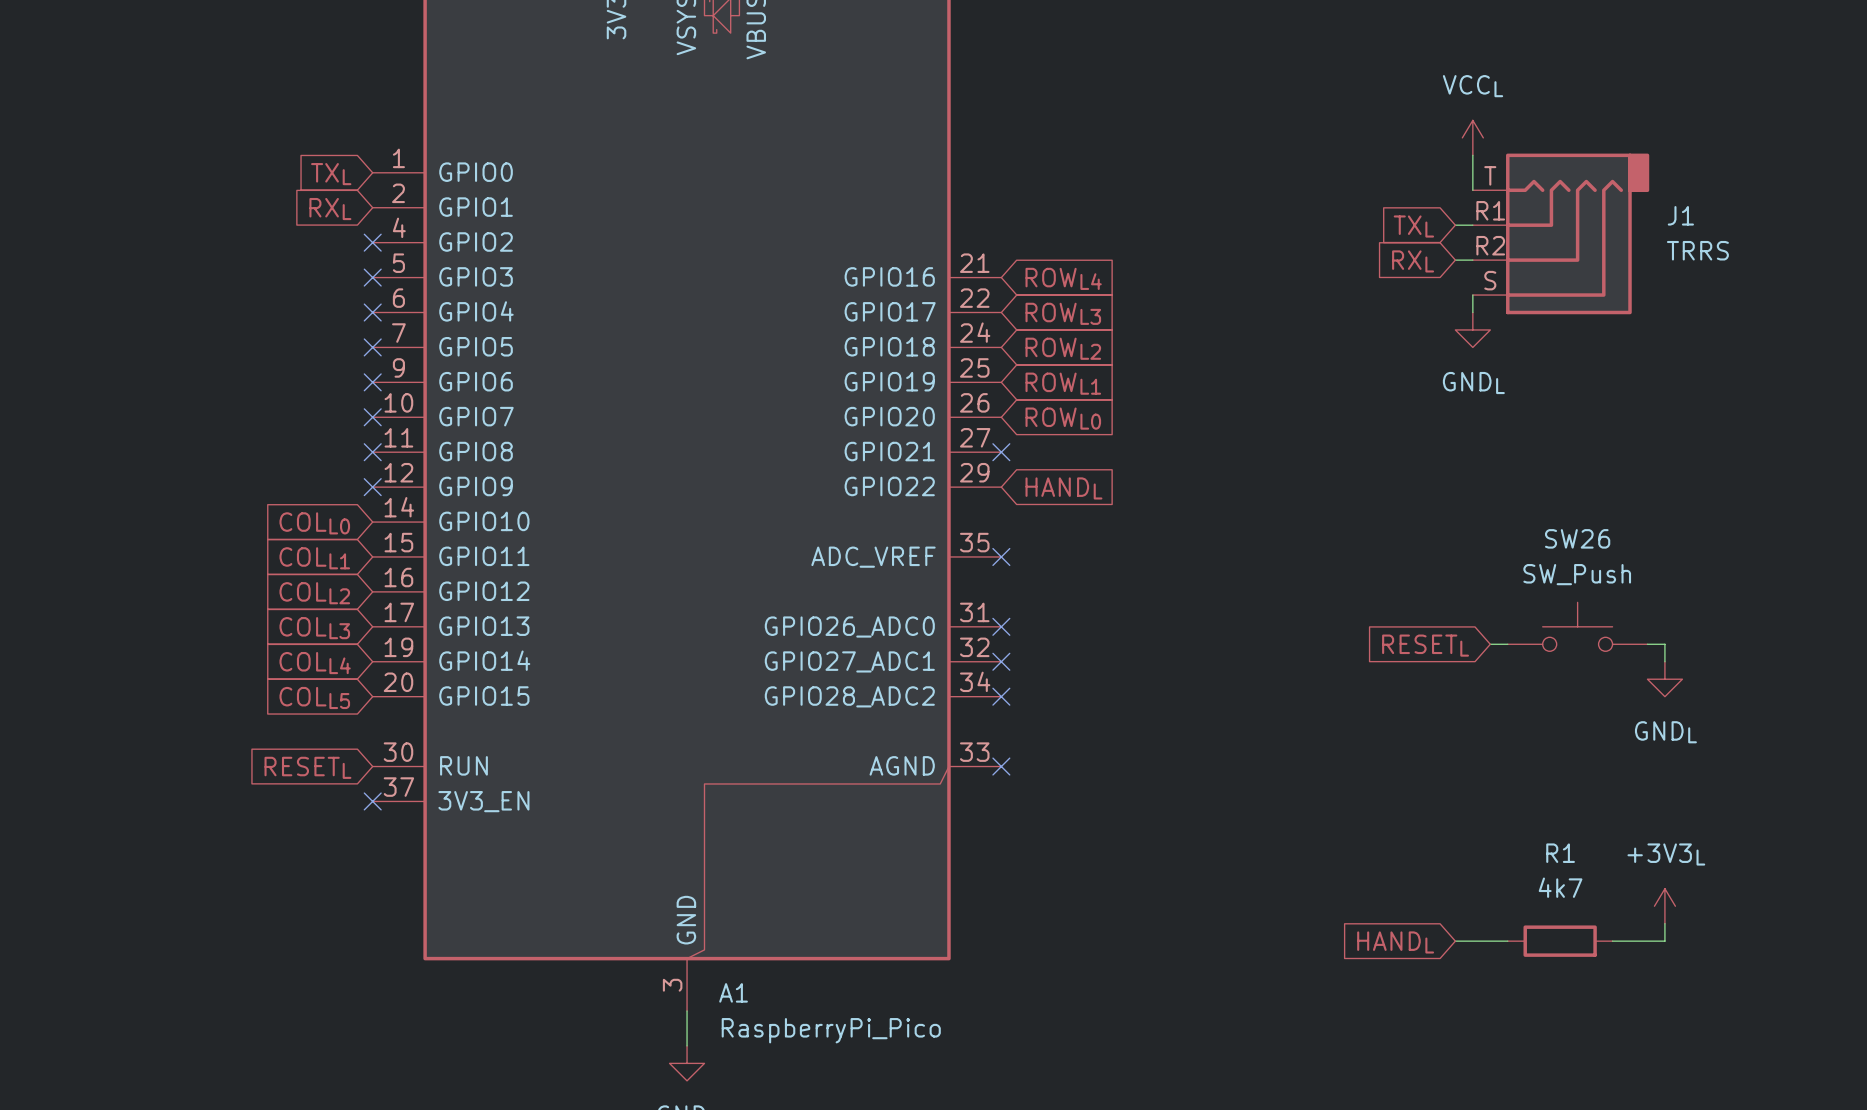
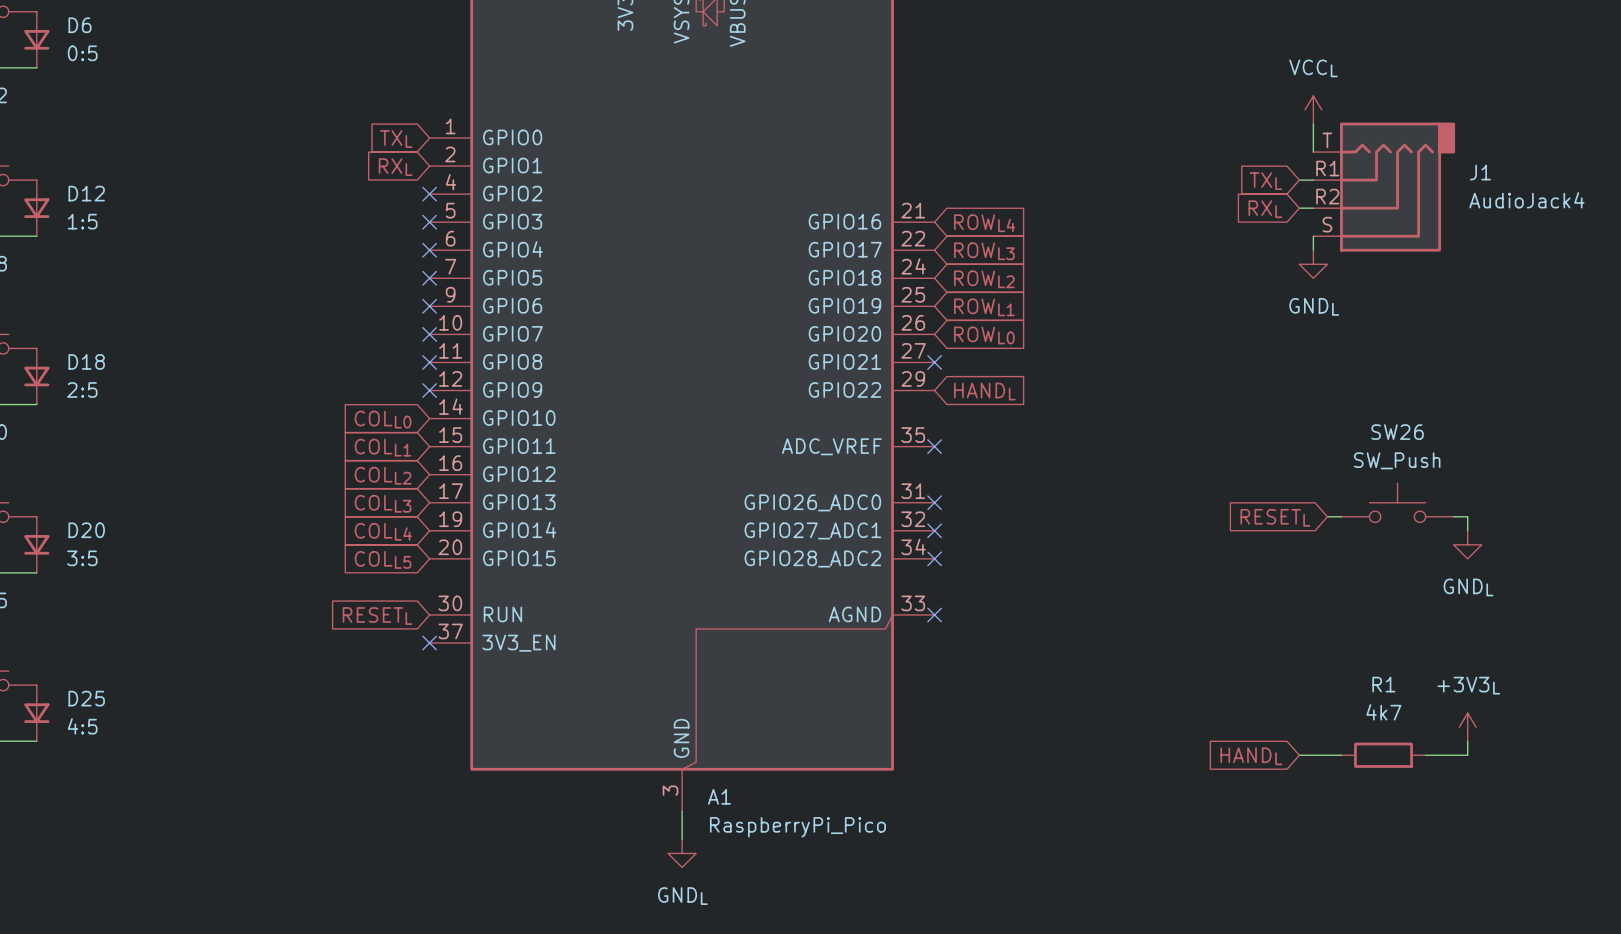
J1 value: TRRS (1697, 250) -> AudioJack4 (1526, 200)

